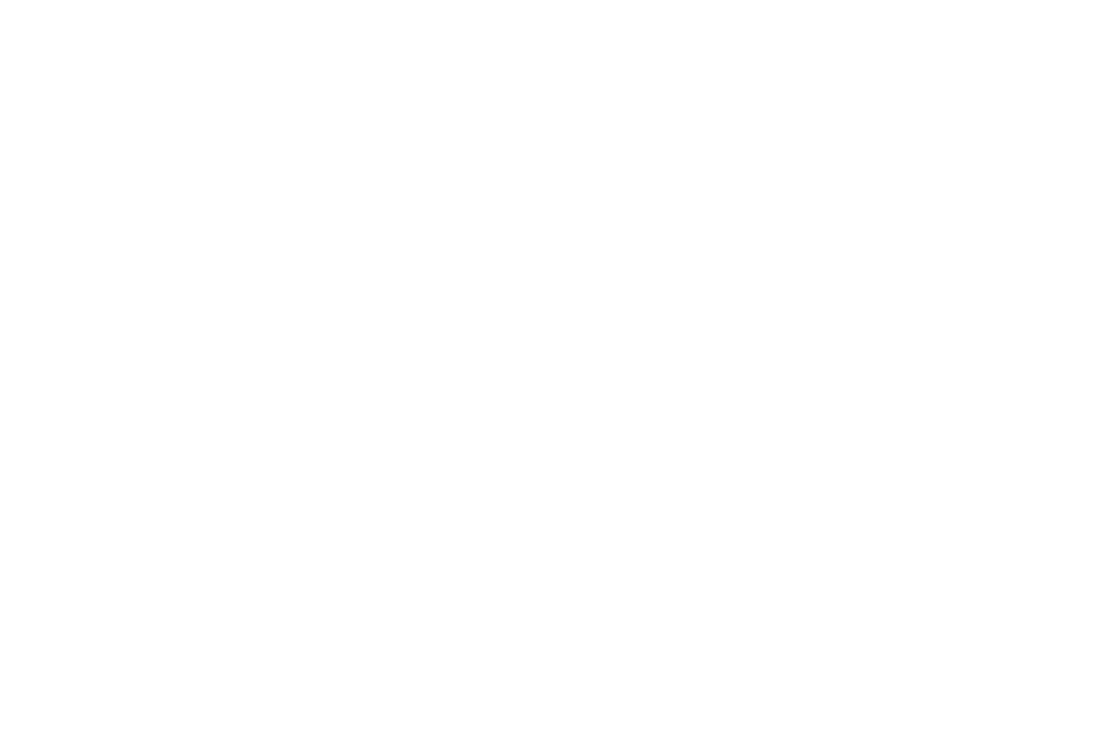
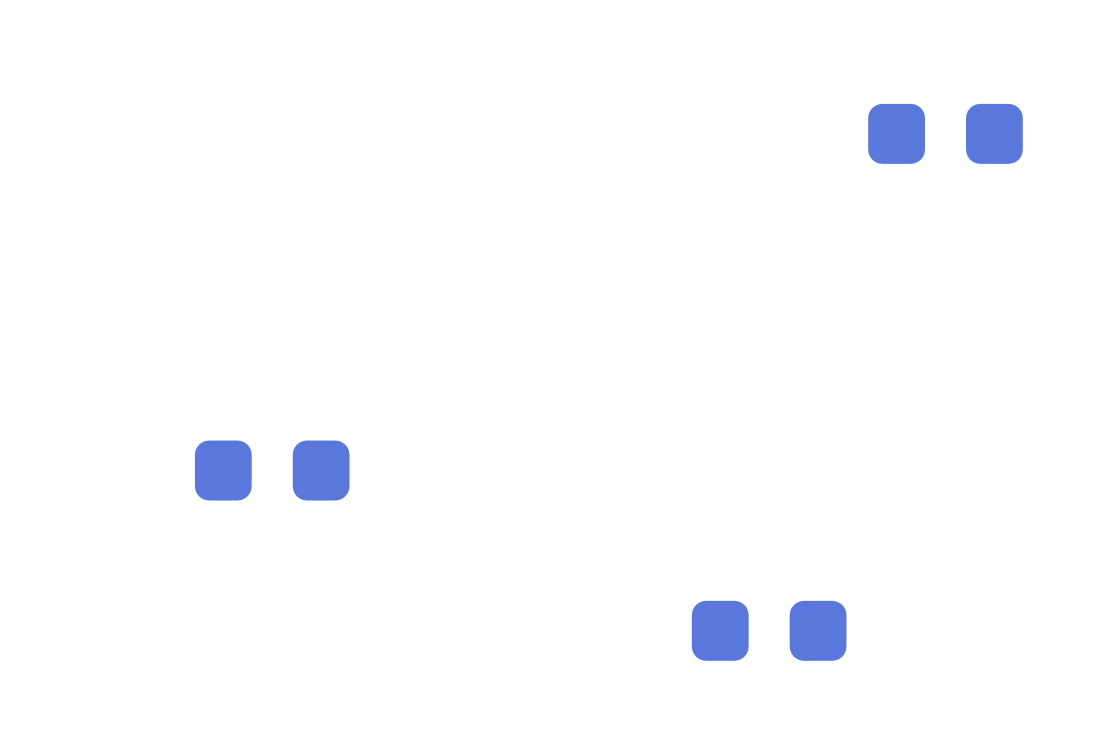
part: none -> (945, 133)
part: none -> (272, 470)
part: none -> (769, 630)

